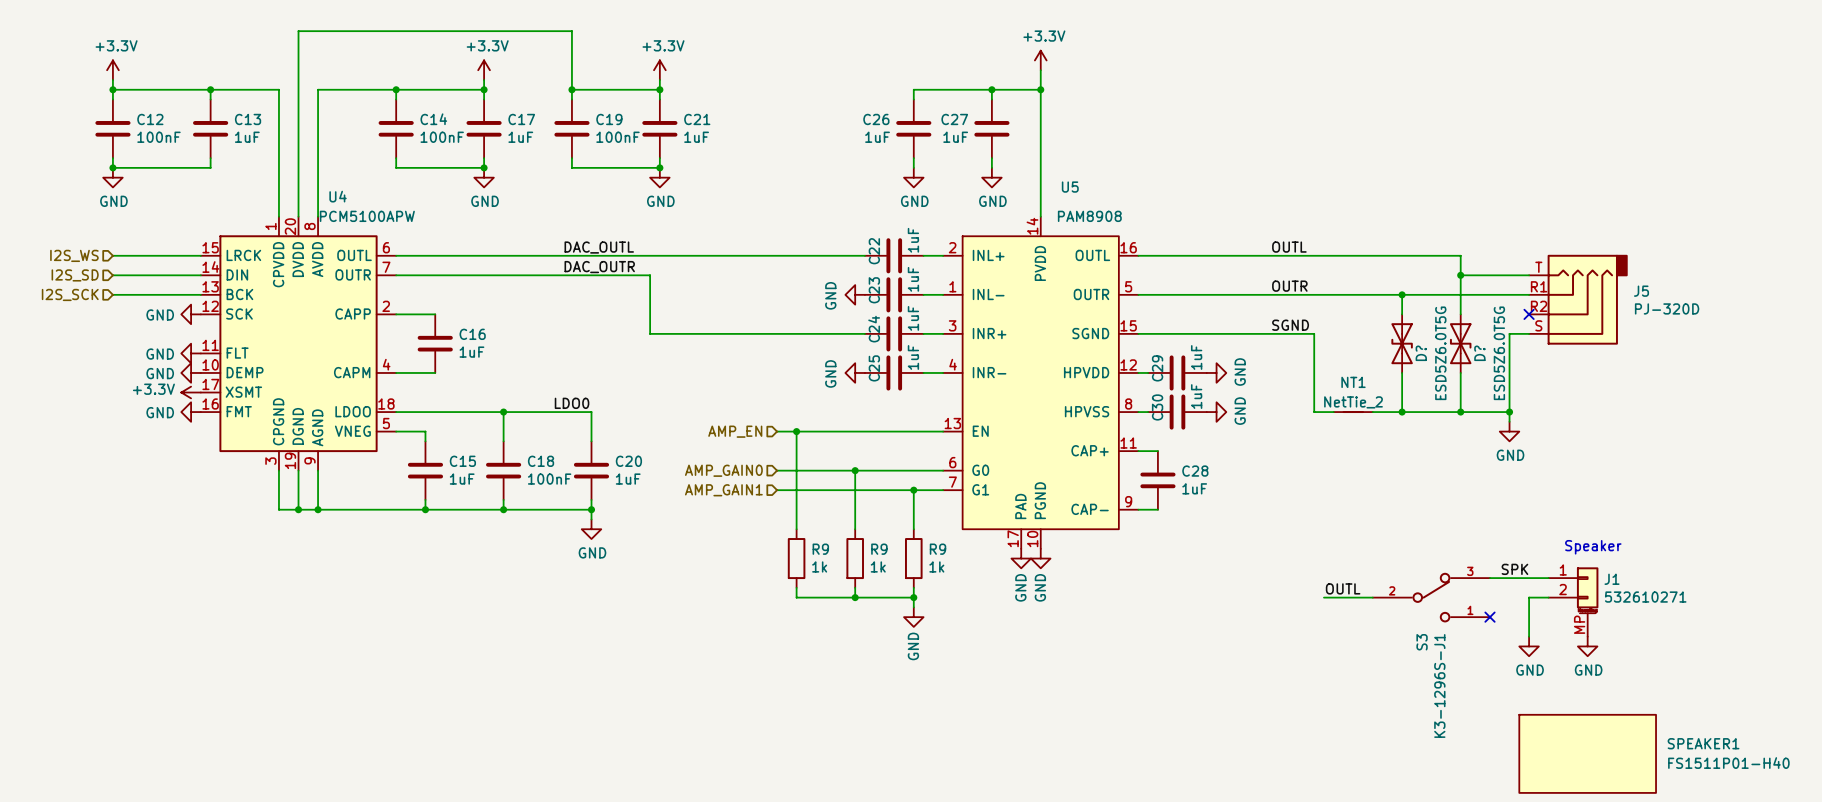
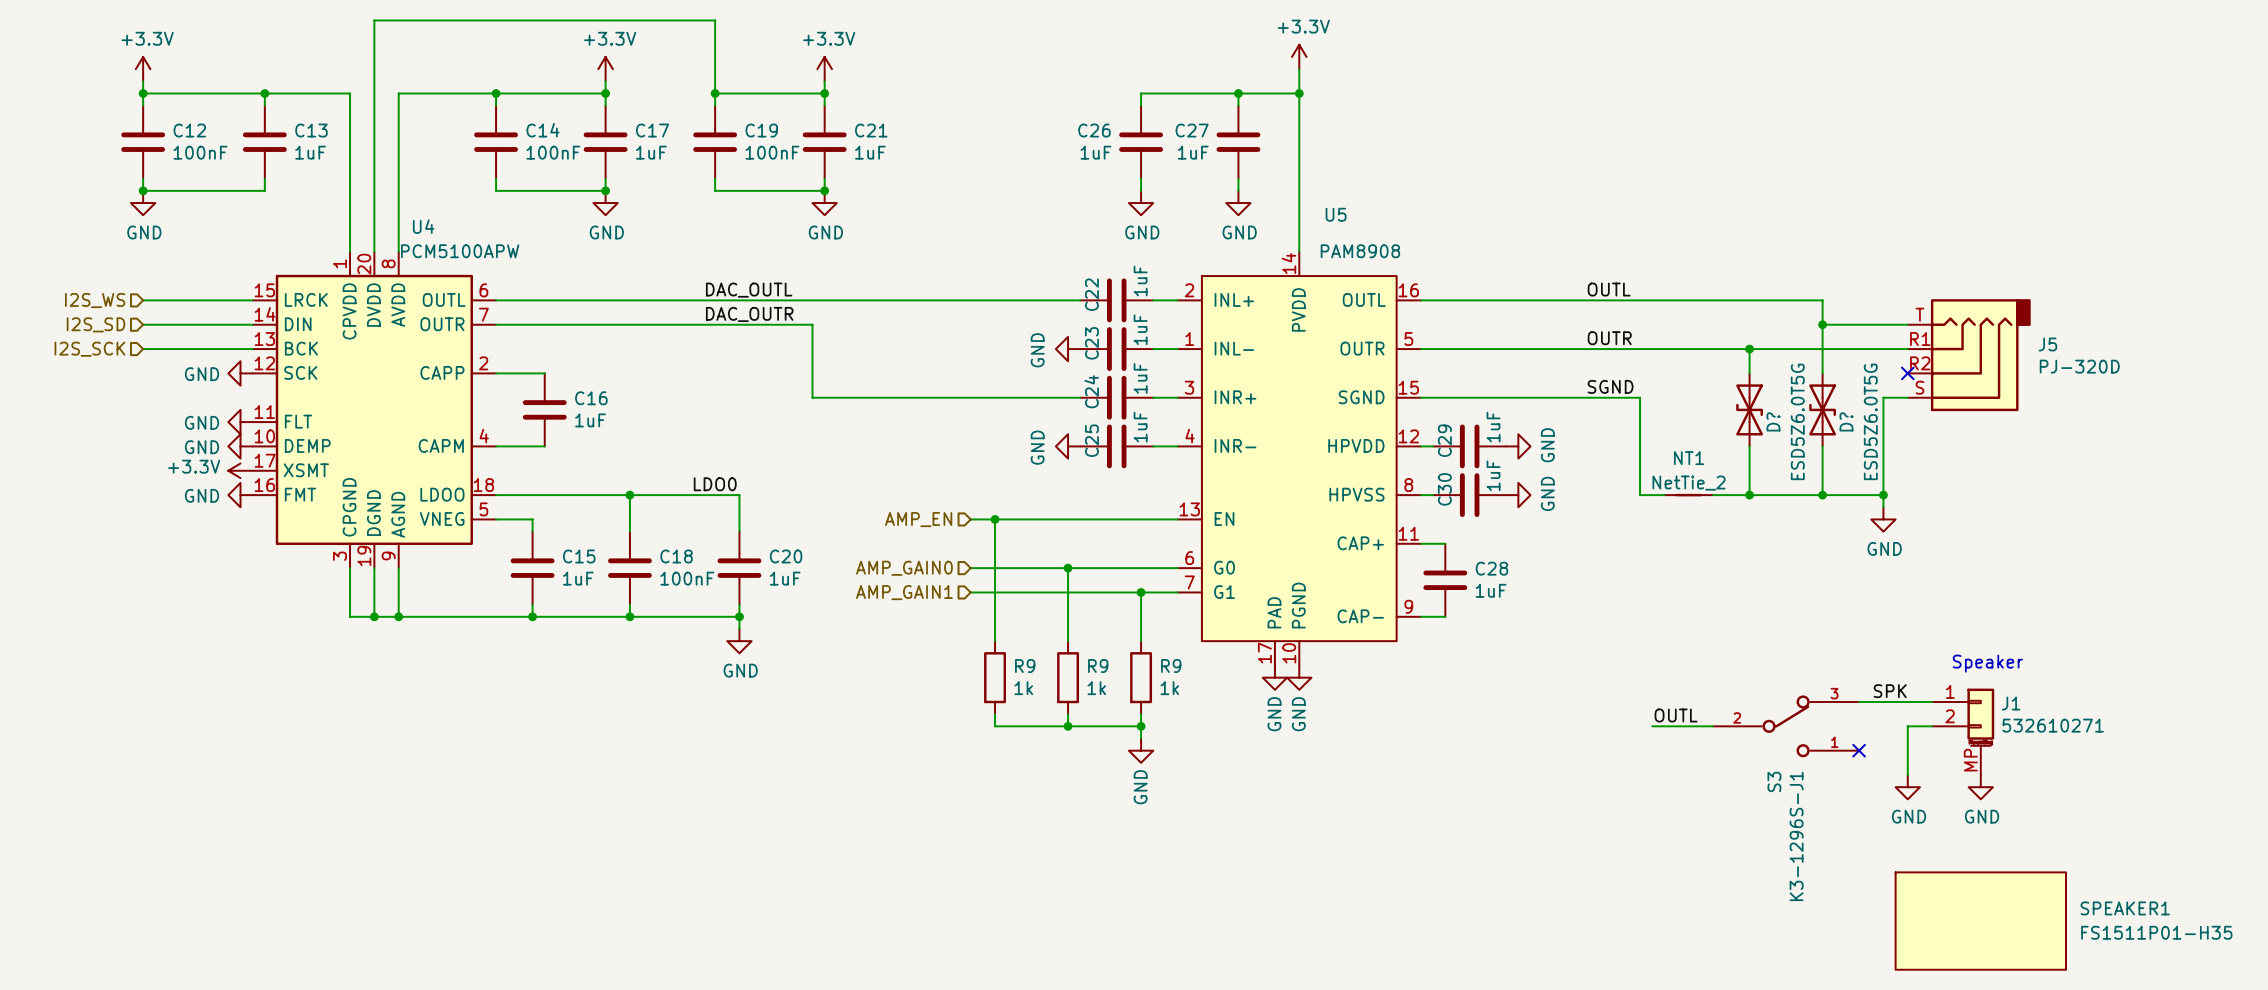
SPEAKER1 value: FS1511P01-H40 (1728, 763) -> FS1511P01-H35 (2156, 932)

